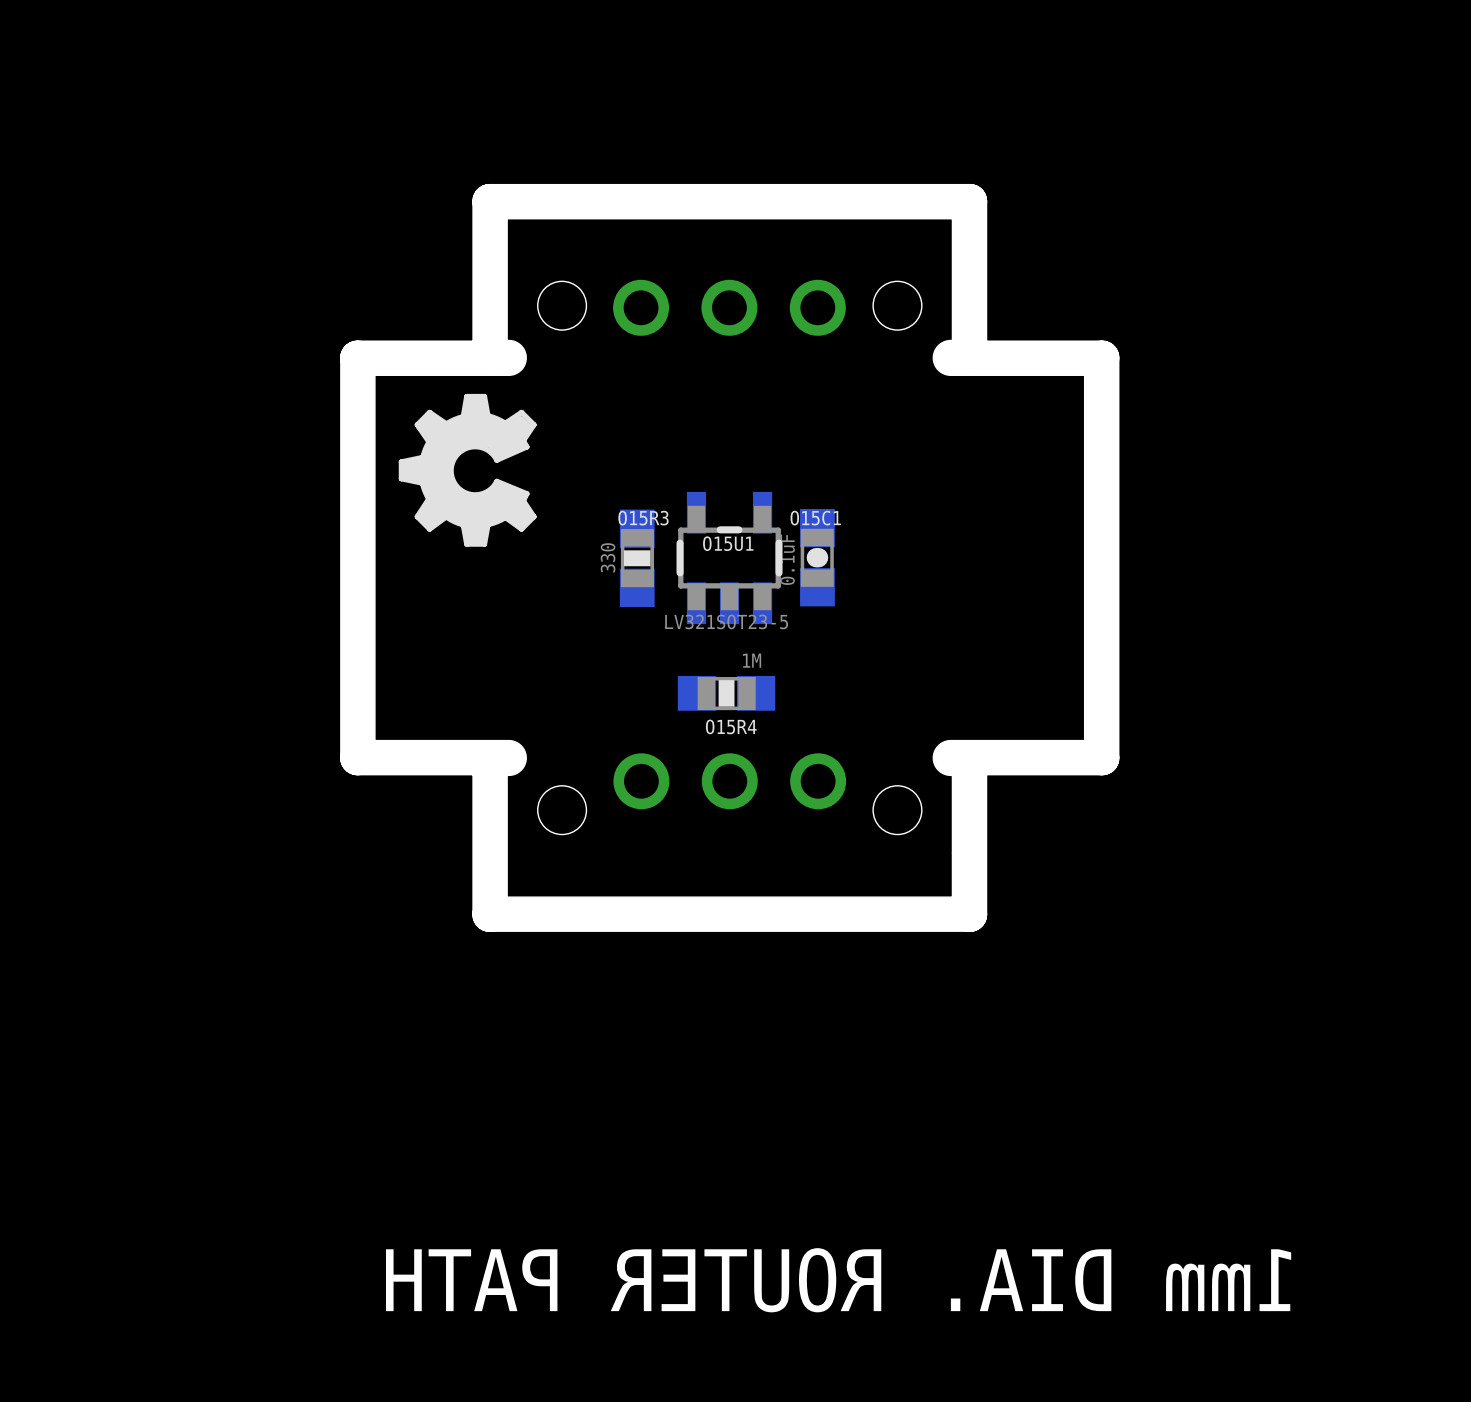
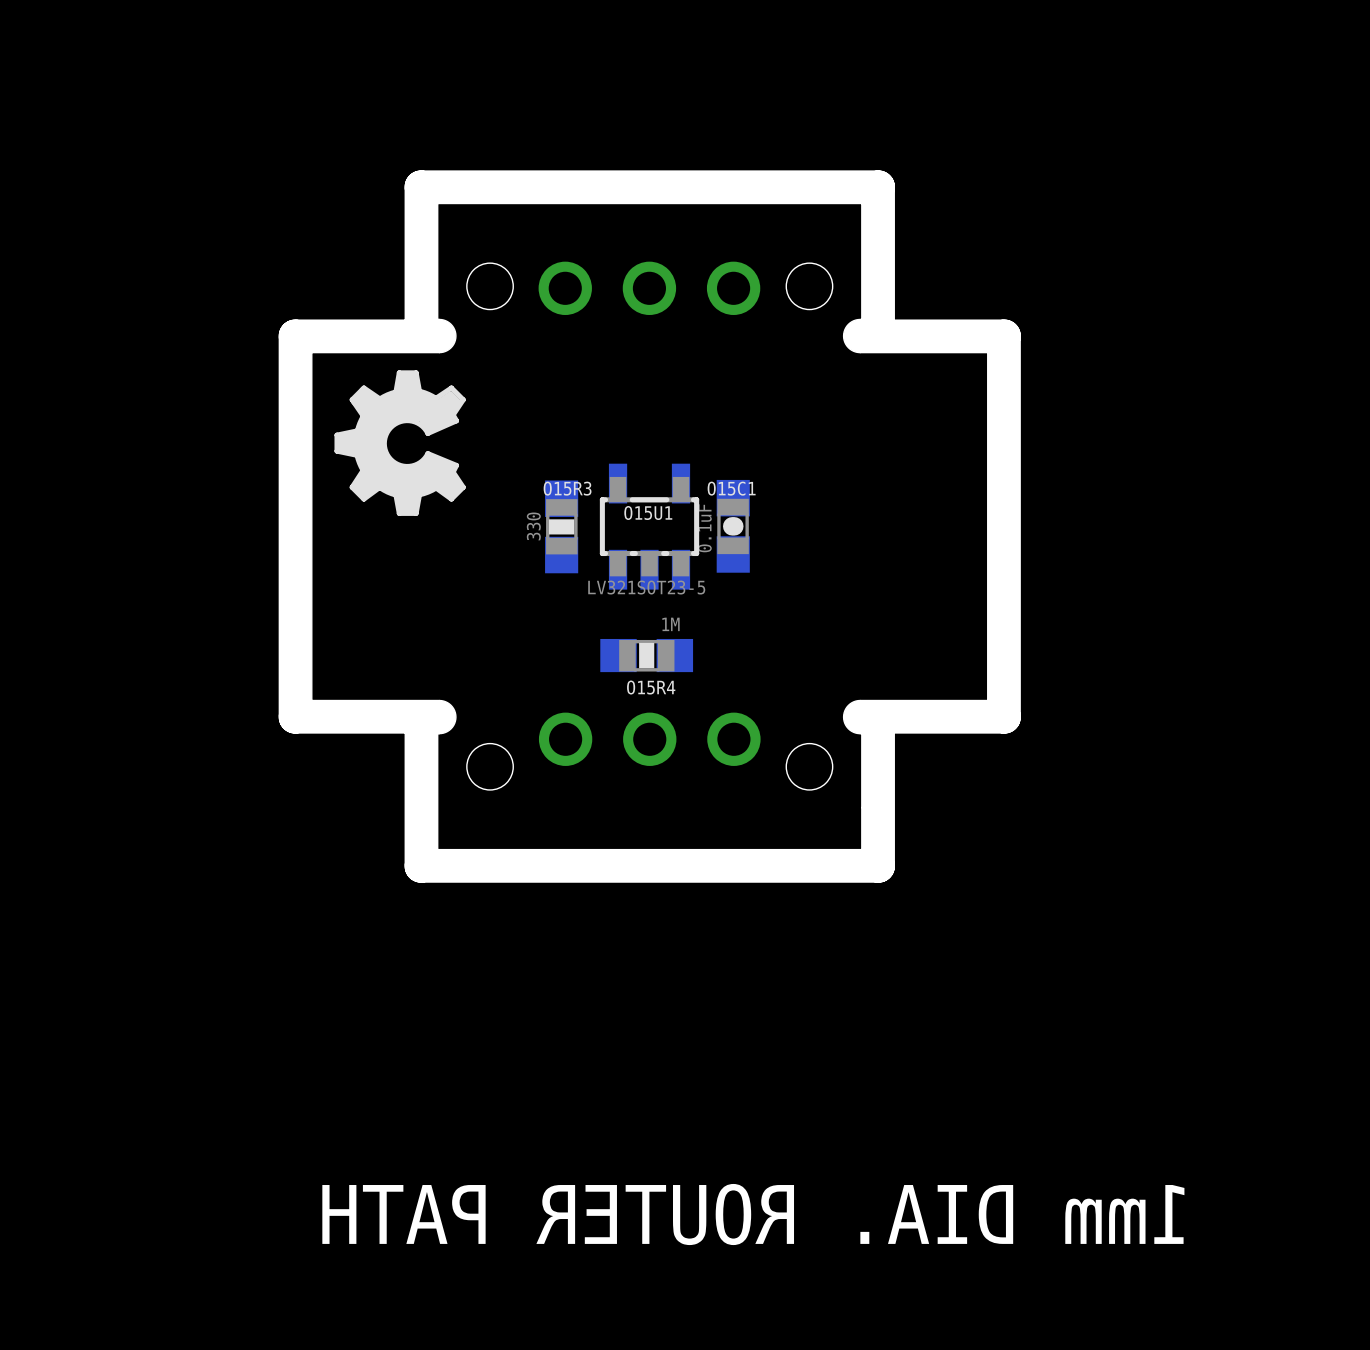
O15U1 footprint: [676, 491, 783, 625] -> [599, 463, 700, 590]

